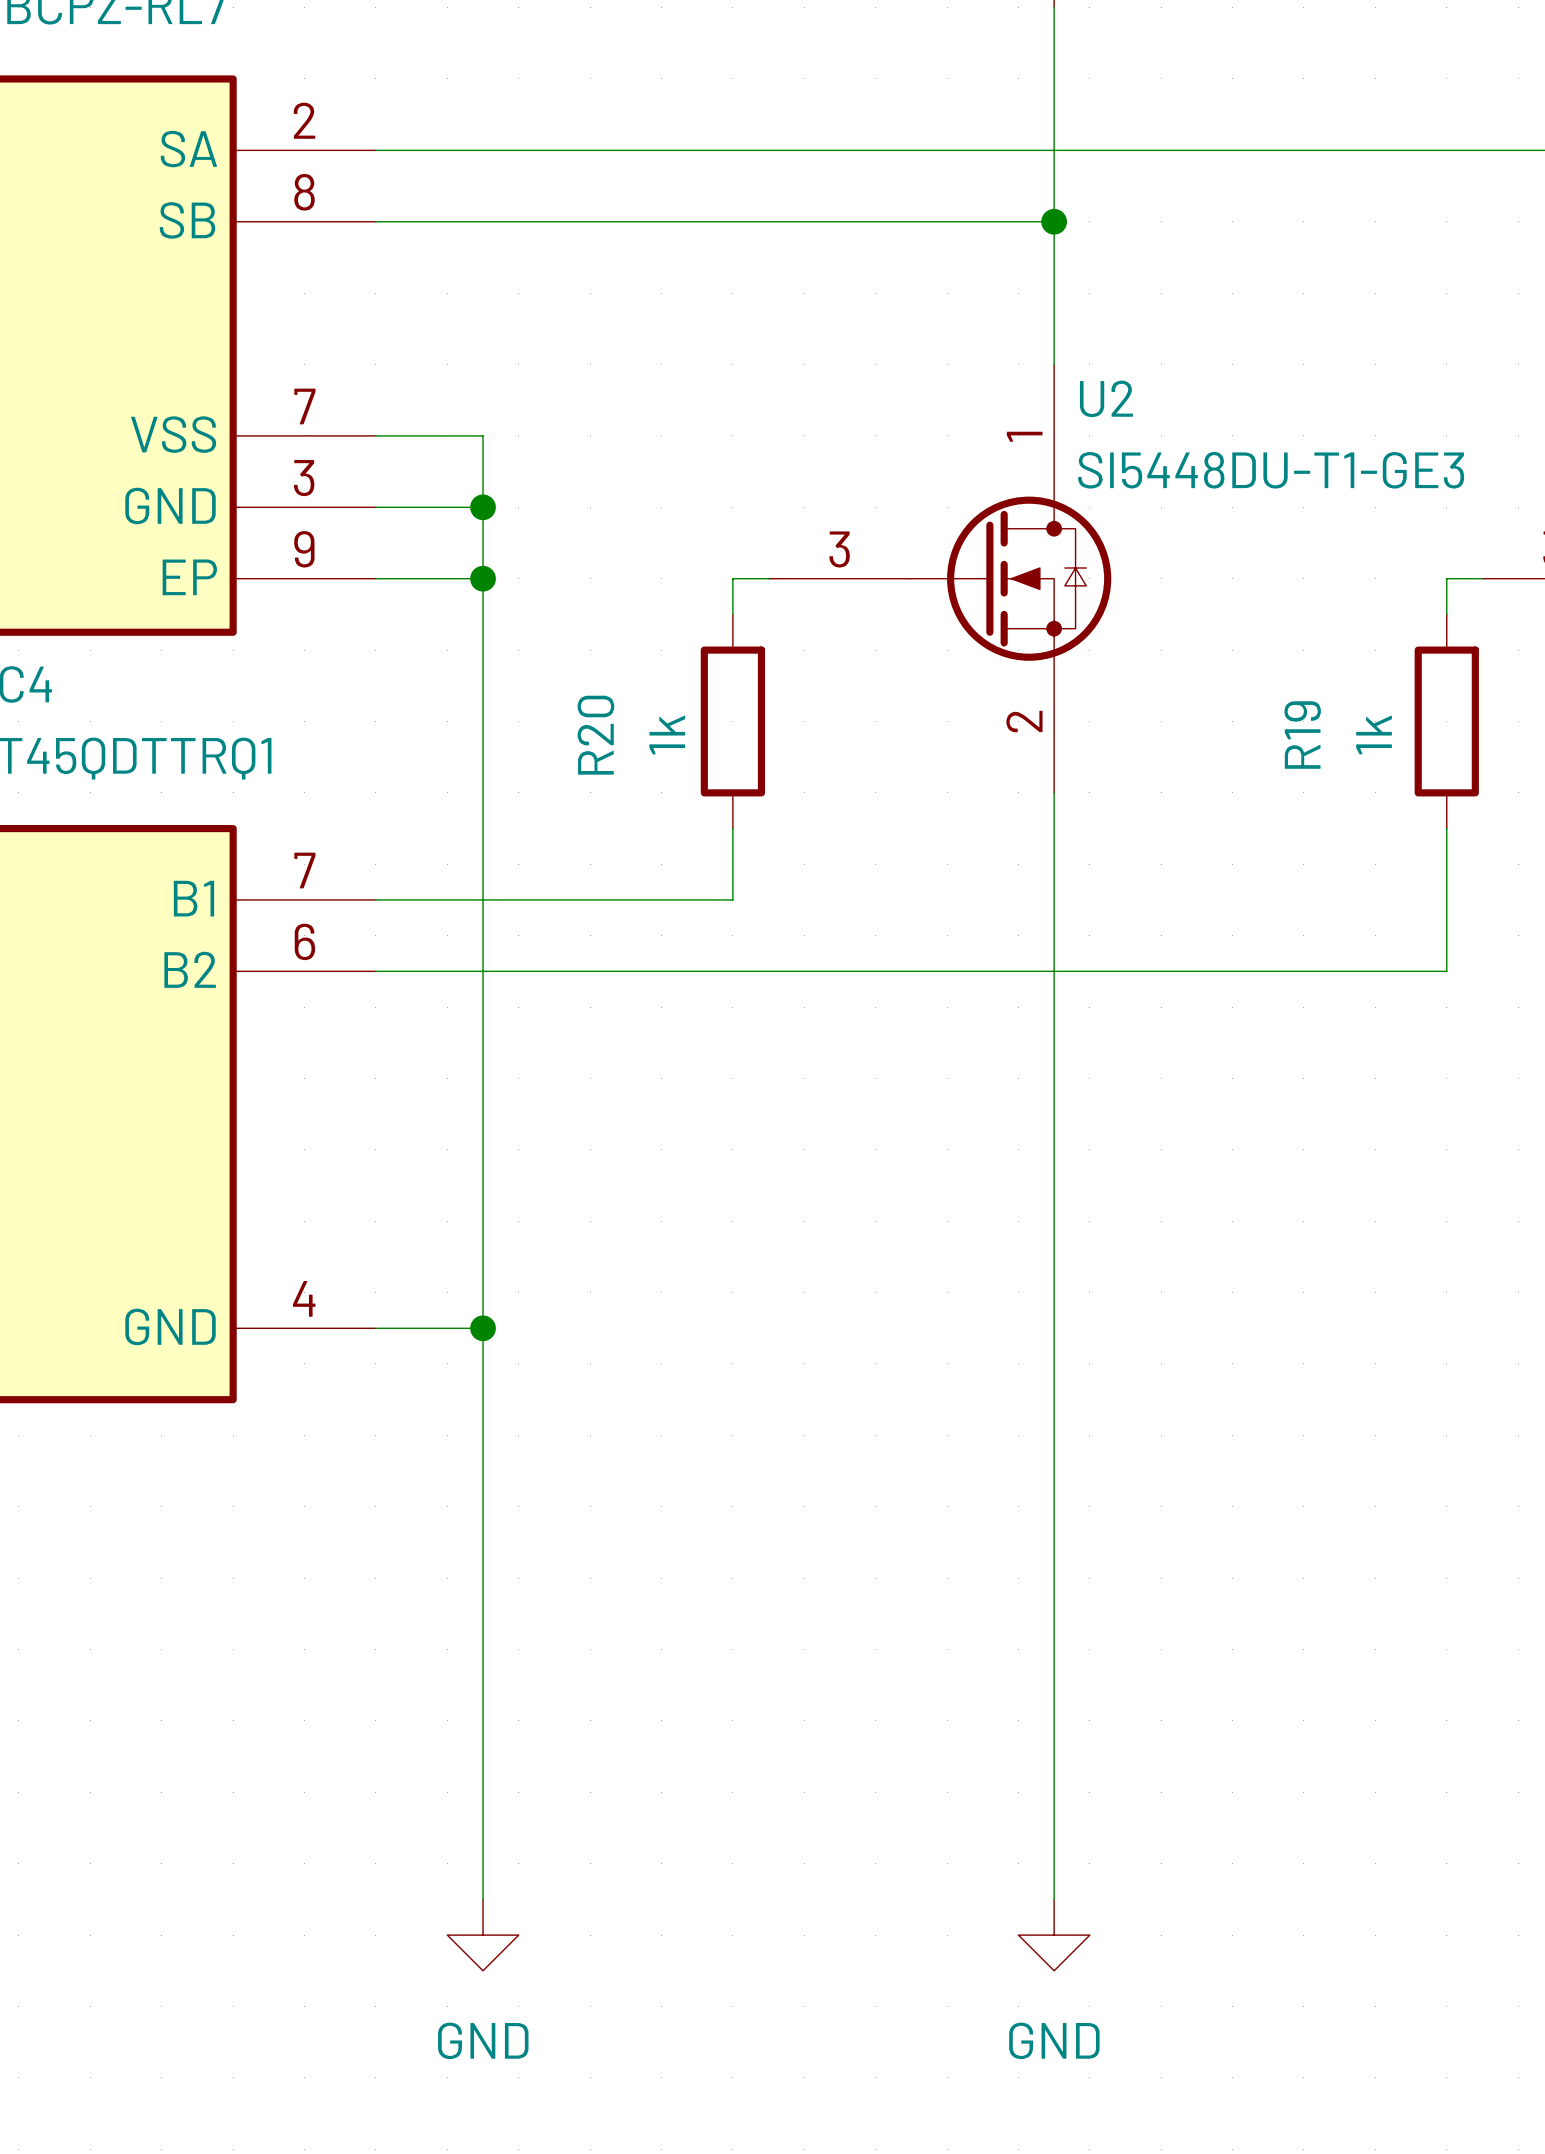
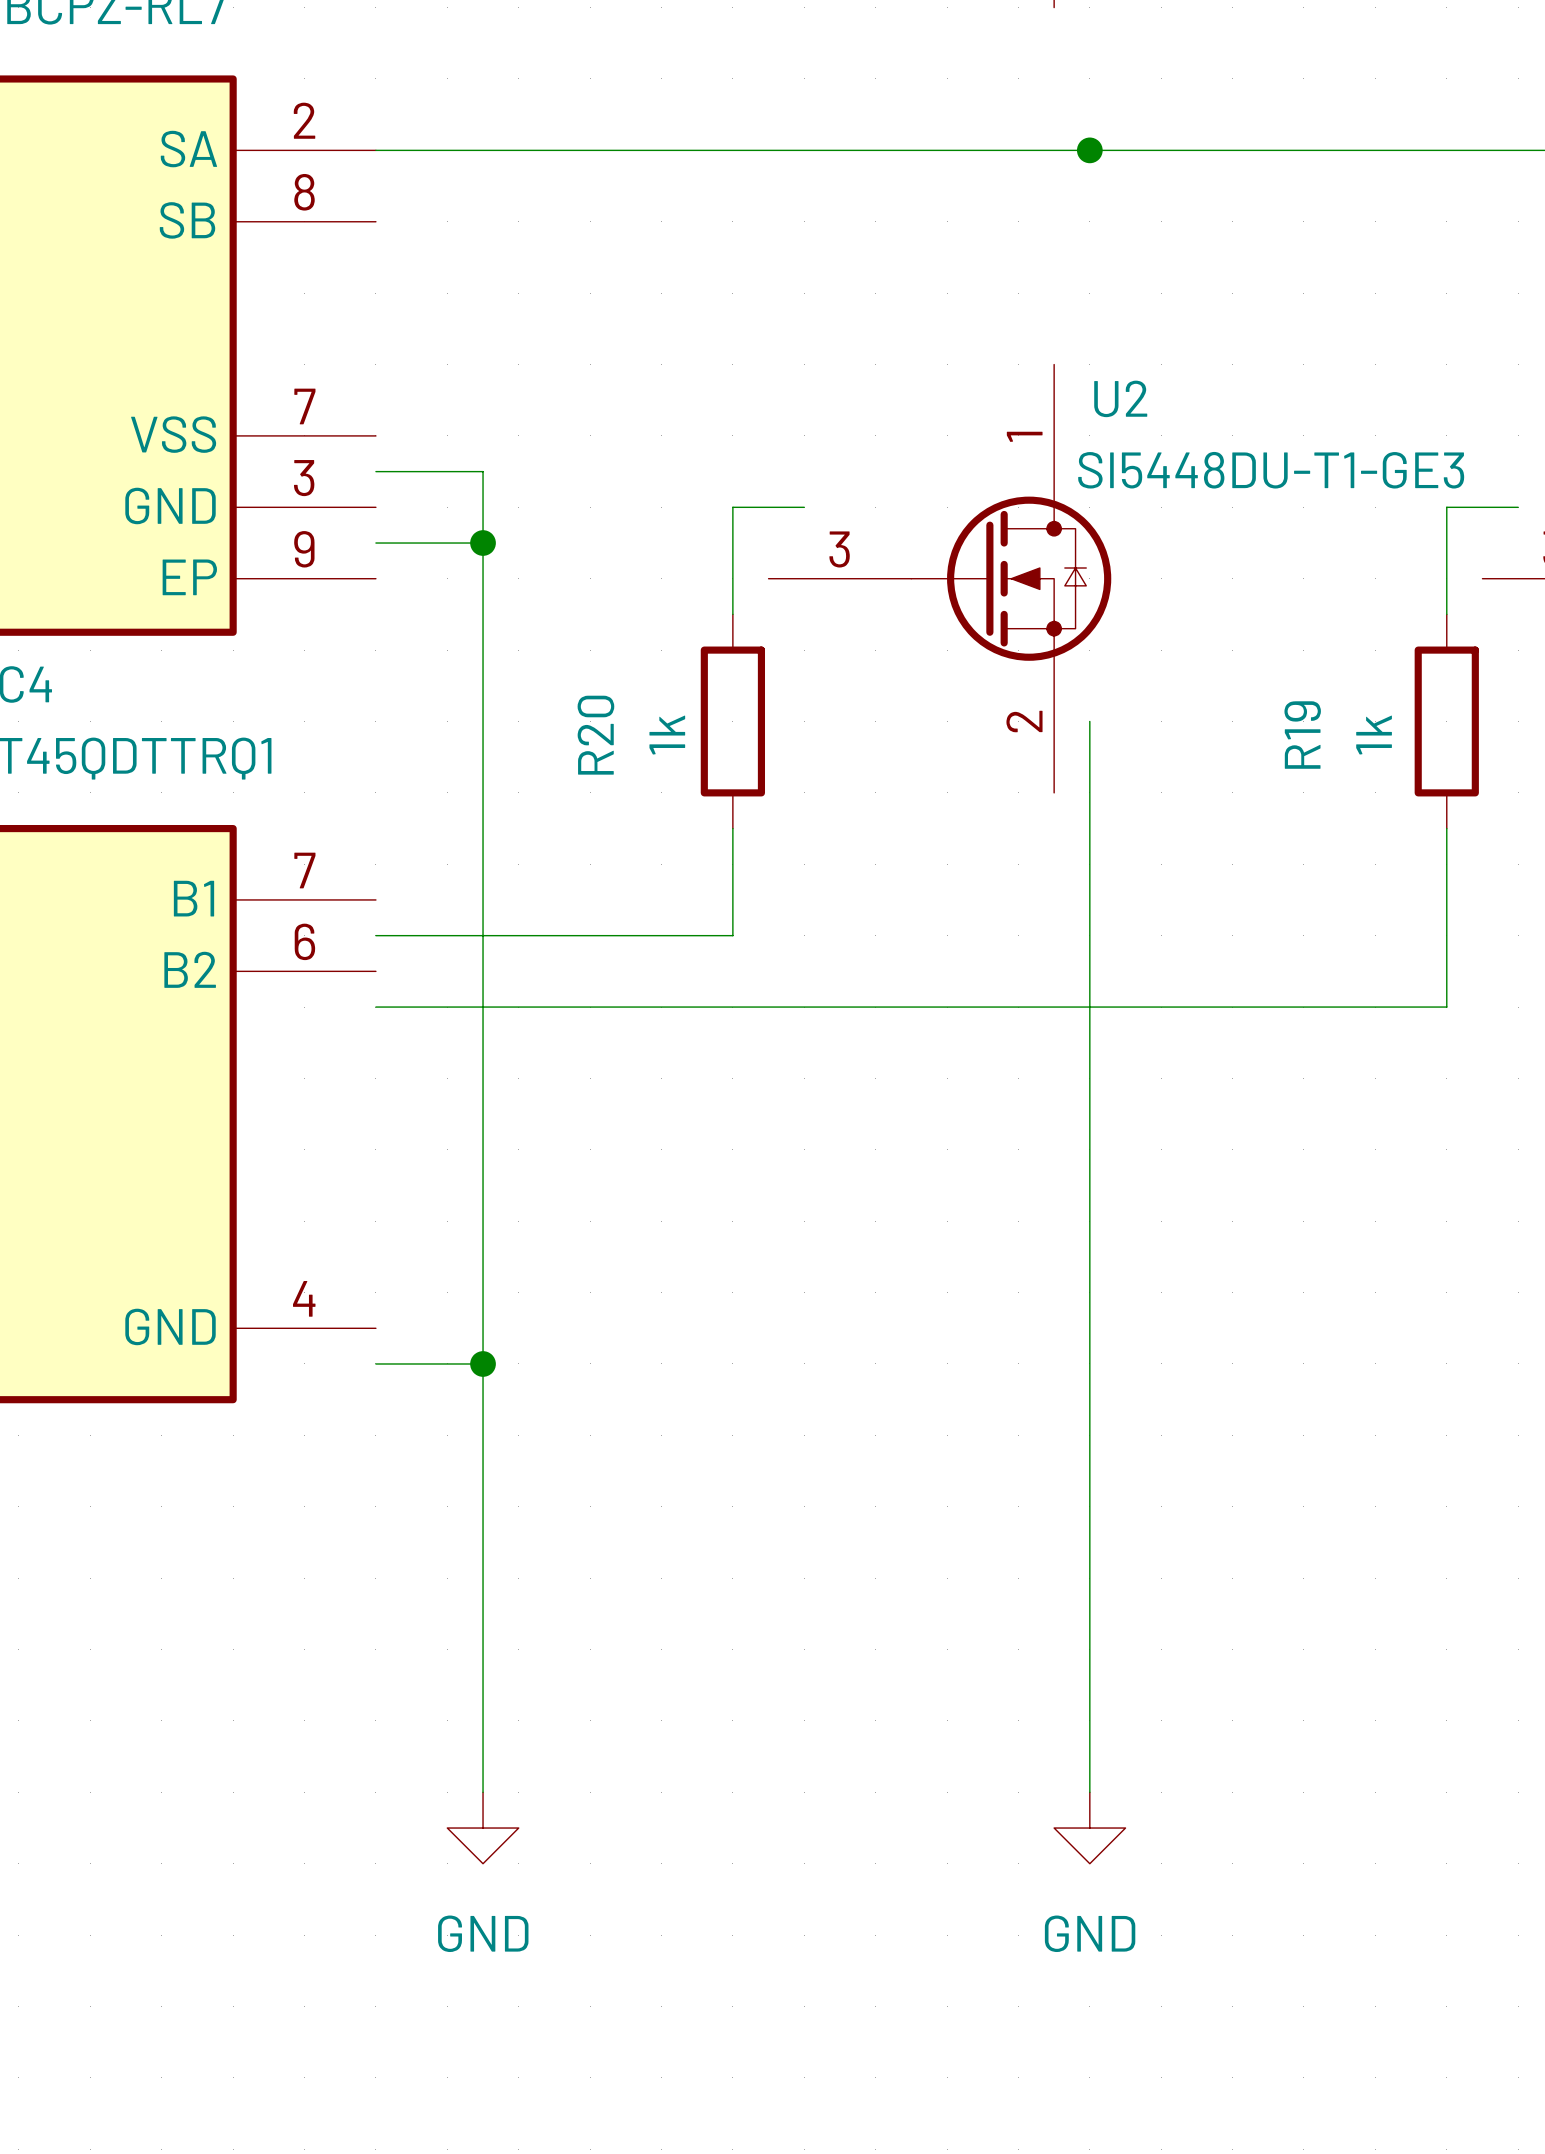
wire: (1054, 7) (1054, 364) -> none
wire: (375, 221) (1054, 221) -> none
junction position: (1054, 221) -> (1089, 150)
U2 name position: U2 (1106, 398) -> U2 (1120, 398)
wire: (375, 435) (483, 435) (483, 471) -> (375, 471) (483, 471)
wire: (375, 507) (483, 507) -> (375, 543) (483, 543)
junction: (483, 507) -> none
junction: none -> (483, 543)
wire: (375, 578) (483, 578) -> none
junction: (483, 578) -> none
wire: (732, 578) (768, 578) -> (732, 578) (732, 507) (804, 507)
wire: (1446, 578) (1482, 578) -> (1446, 578) (1446, 507) (1518, 507)
wire: none -> (1089, 721) (1089, 1792)
wire: (1054, 792) (1054, 1899) -> none
wire: (375, 899) (732, 899) -> (375, 935) (732, 935) (732, 899)
wire: (375, 971) (1446, 971) -> (375, 1007) (1446, 1007) (1446, 971)
wire: (375, 1328) (483, 1328) -> (375, 1363) (483, 1363)
junction position: (483, 1328) -> (483, 1363)
wire: (483, 1792) (483, 1899) -> none
power symbol position: GND (483, 1935) -> GND (483, 1828)
power symbol position: GND (1054, 1935) -> GND (1089, 1828)

